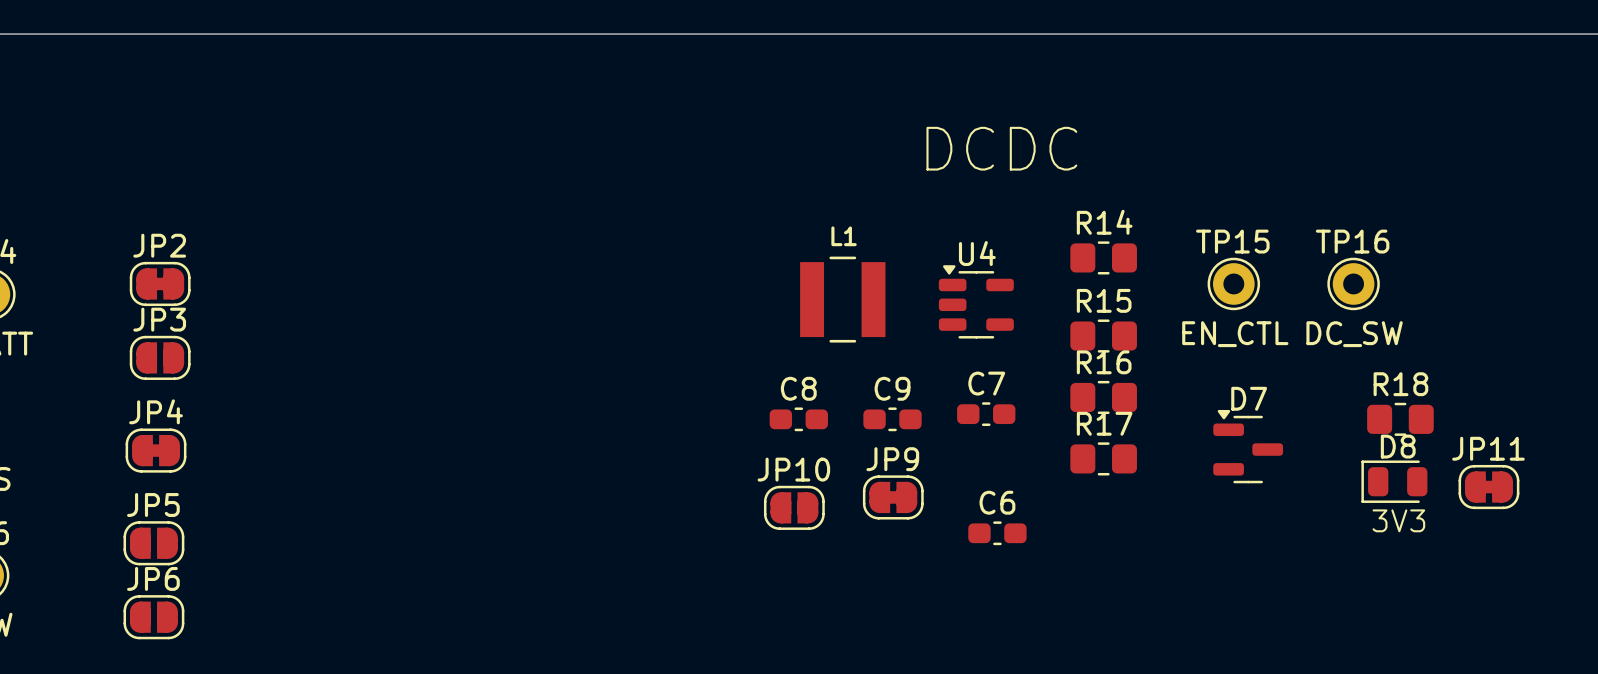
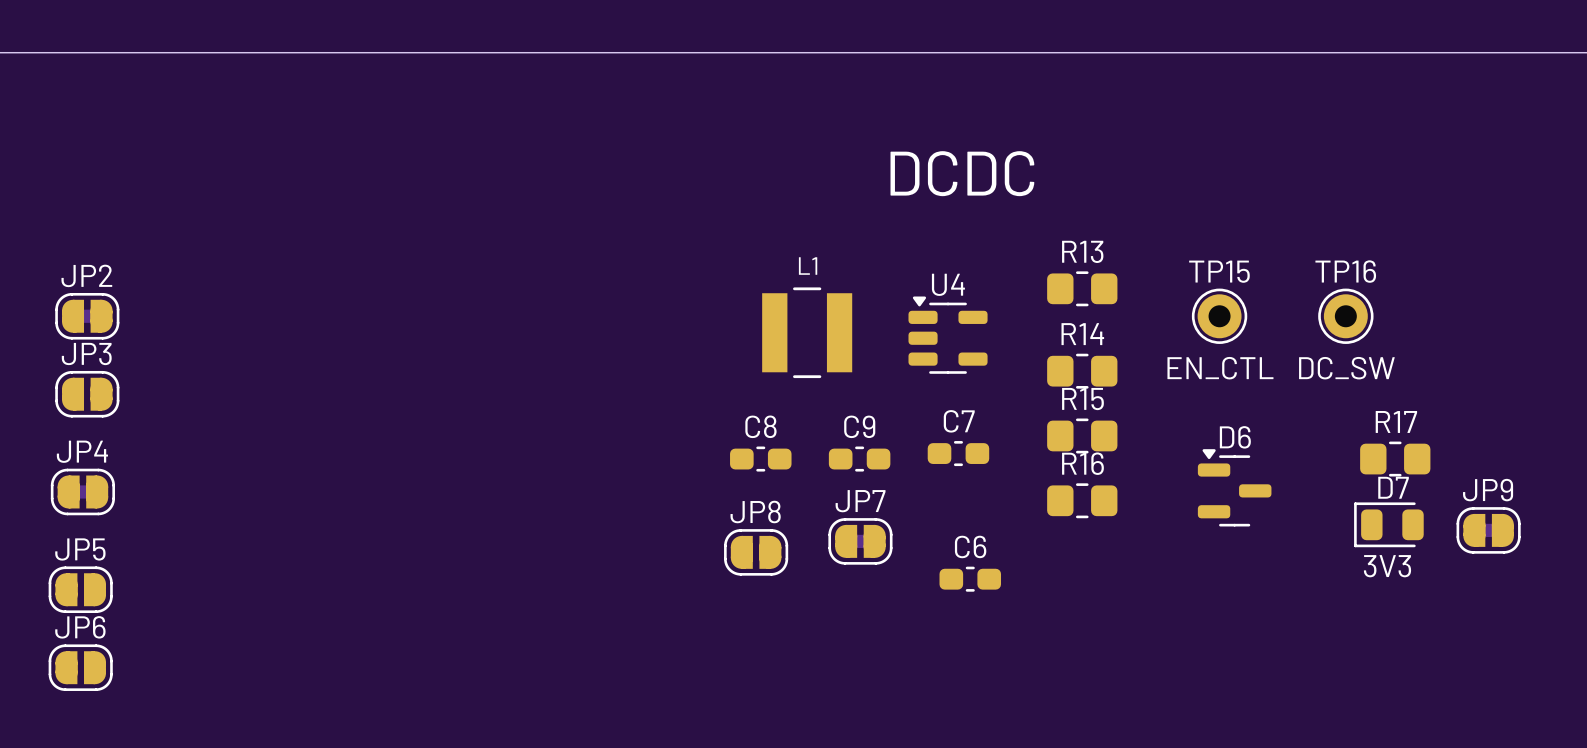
R14 name: R14 (1104, 222) -> R13 (1082, 251)
R15 name: R15 (1104, 300) -> R14 (1082, 334)
R16 name: R16 (1104, 362) -> R15 (1082, 399)
R18 name: R18 (1400, 384) -> R17 (1396, 421)
D7 name: D7 (1249, 398) -> D6 (1235, 437)
R17 name: R17 (1104, 423) -> R16 (1082, 463)
D8 name: D8 (1398, 446) -> D7 (1393, 487)
JP11 name: JP11 (1488, 448) -> JP9 (1488, 490)
JP9 name: JP9 (892, 459) -> JP7 (860, 501)
JP10 name: JP10 (793, 469) -> JP8 (755, 512)

